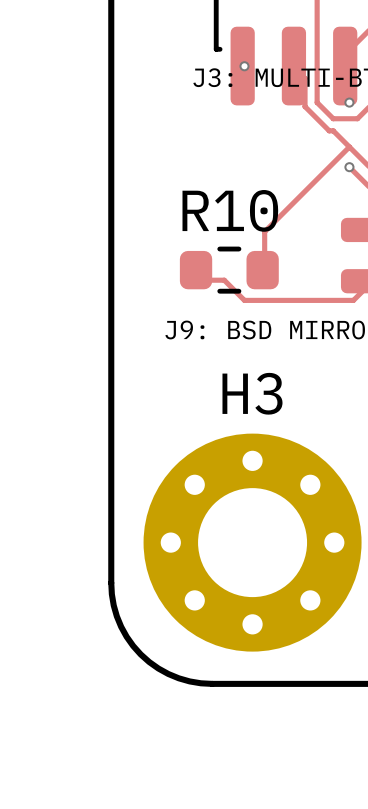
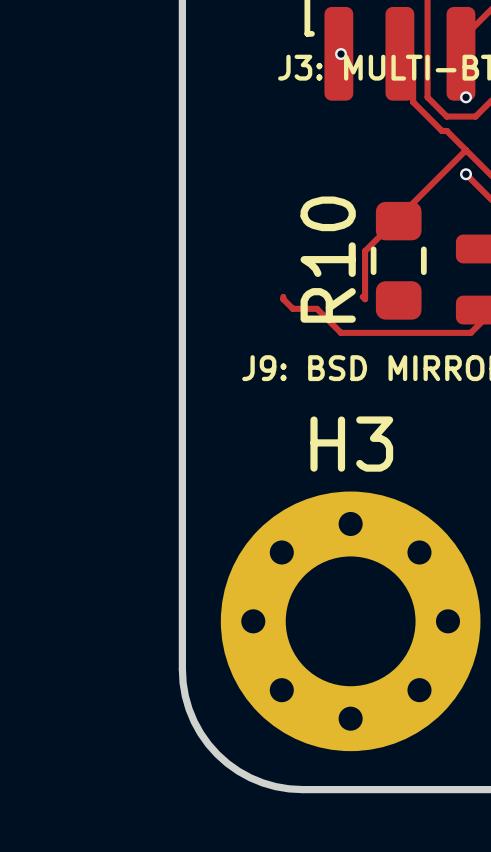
R10 name position: R10 (230, 210) -> R10 (328, 259)
R10 rotation: 0° (229, 270) -> 90° clockwise (398, 260)
R10 position: (229, 270) -> (398, 260)

